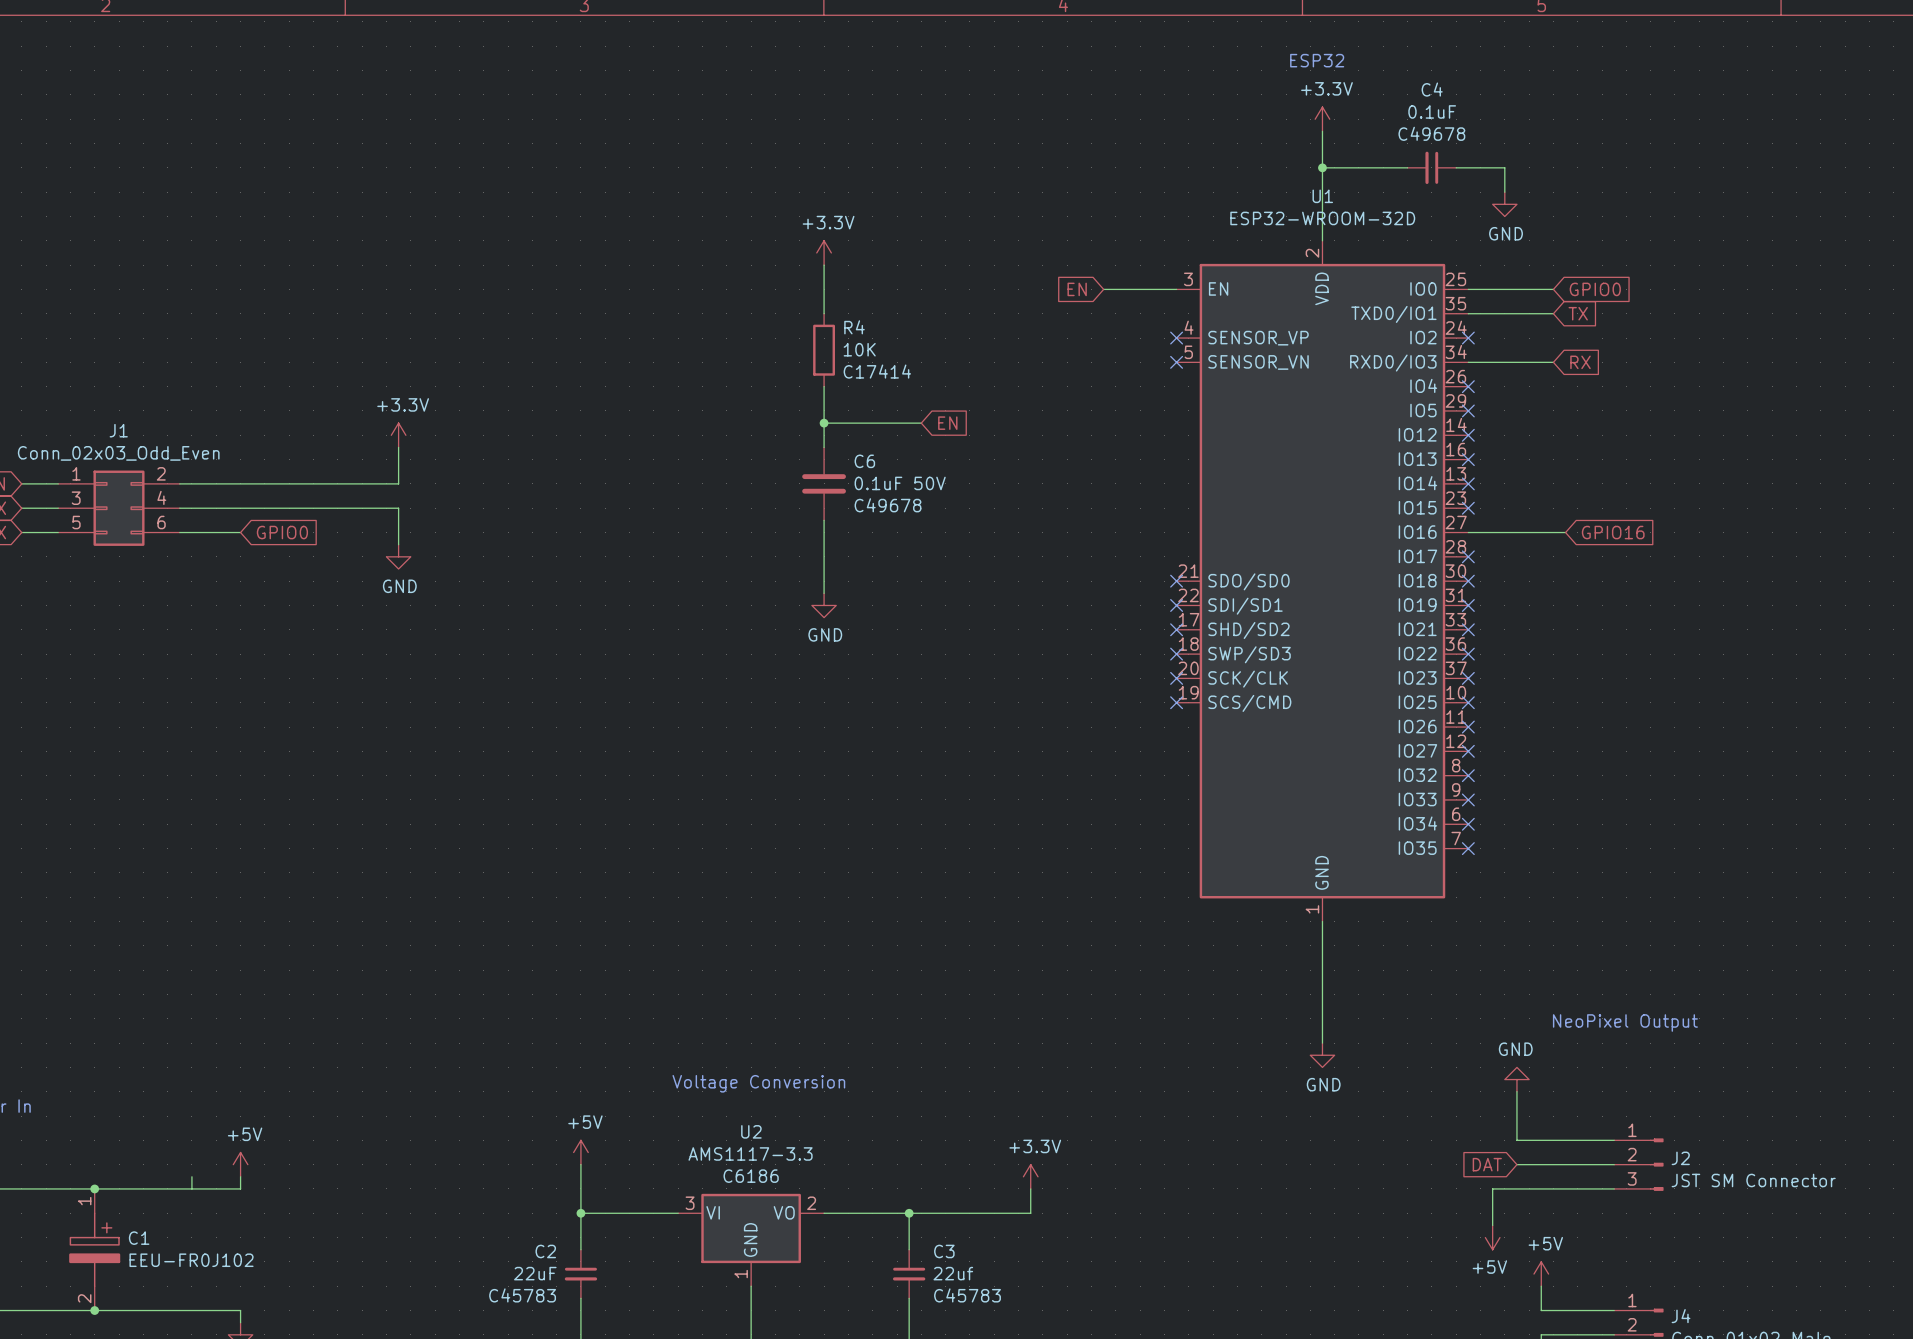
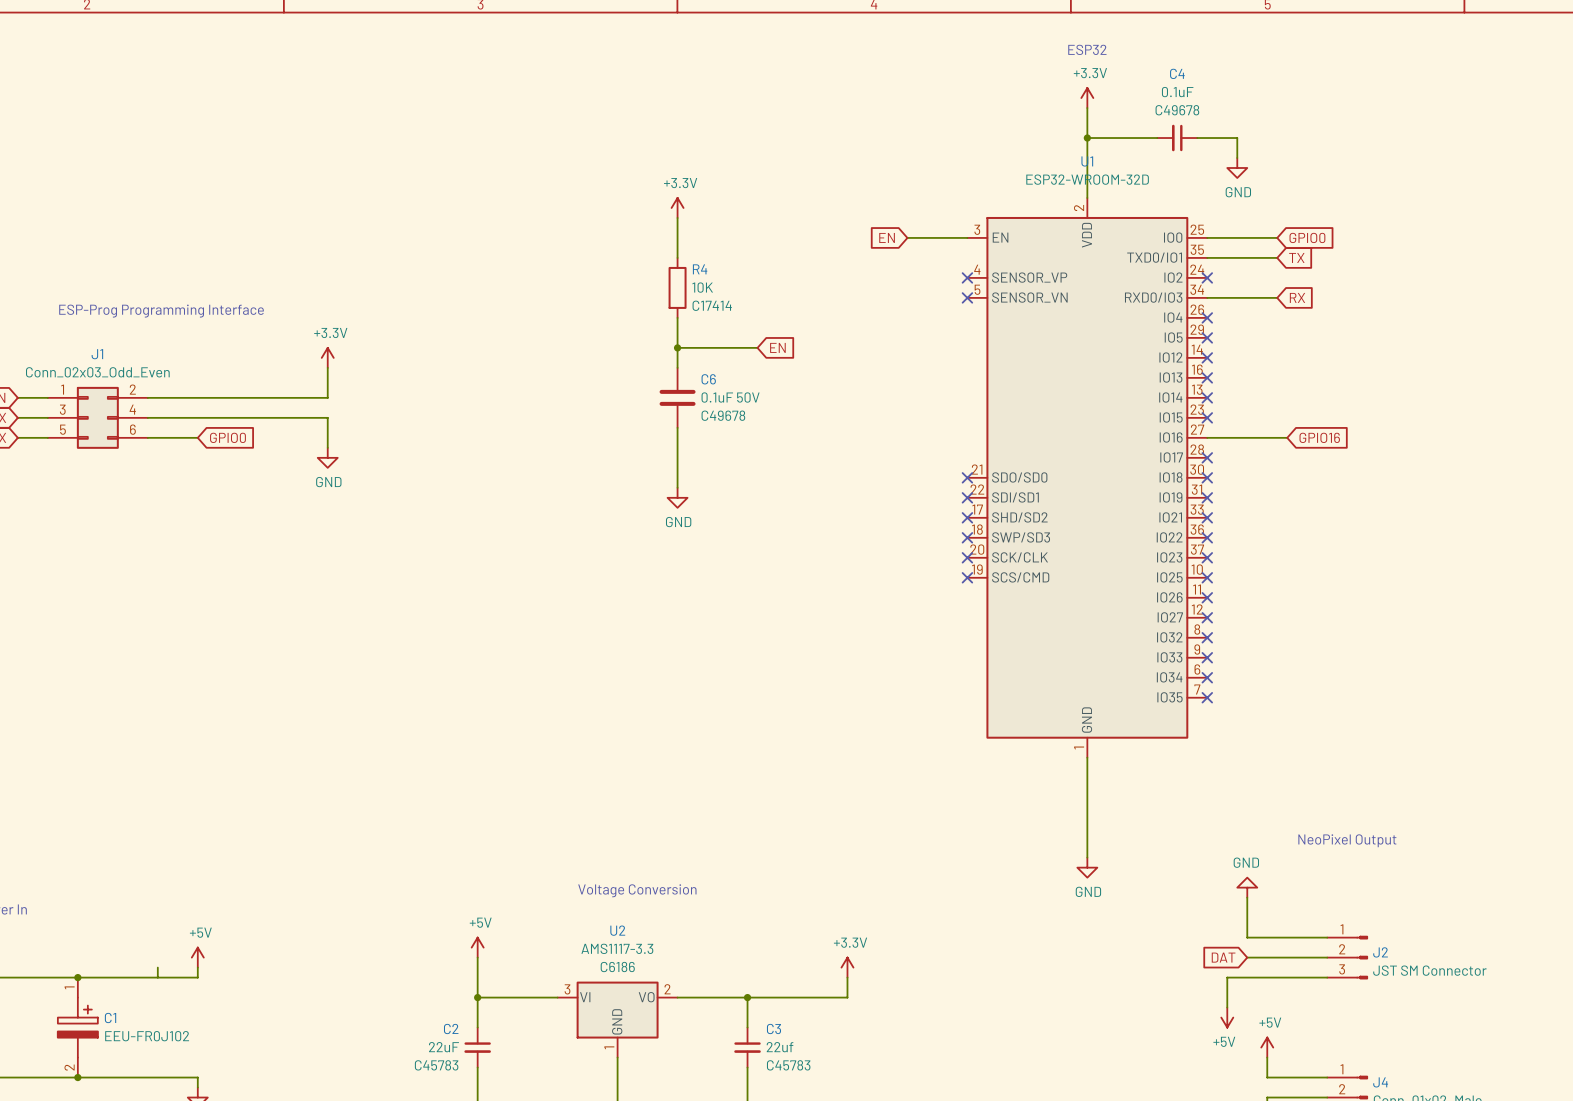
text: none -> ESP-Prog Programming Interface (161, 311)

